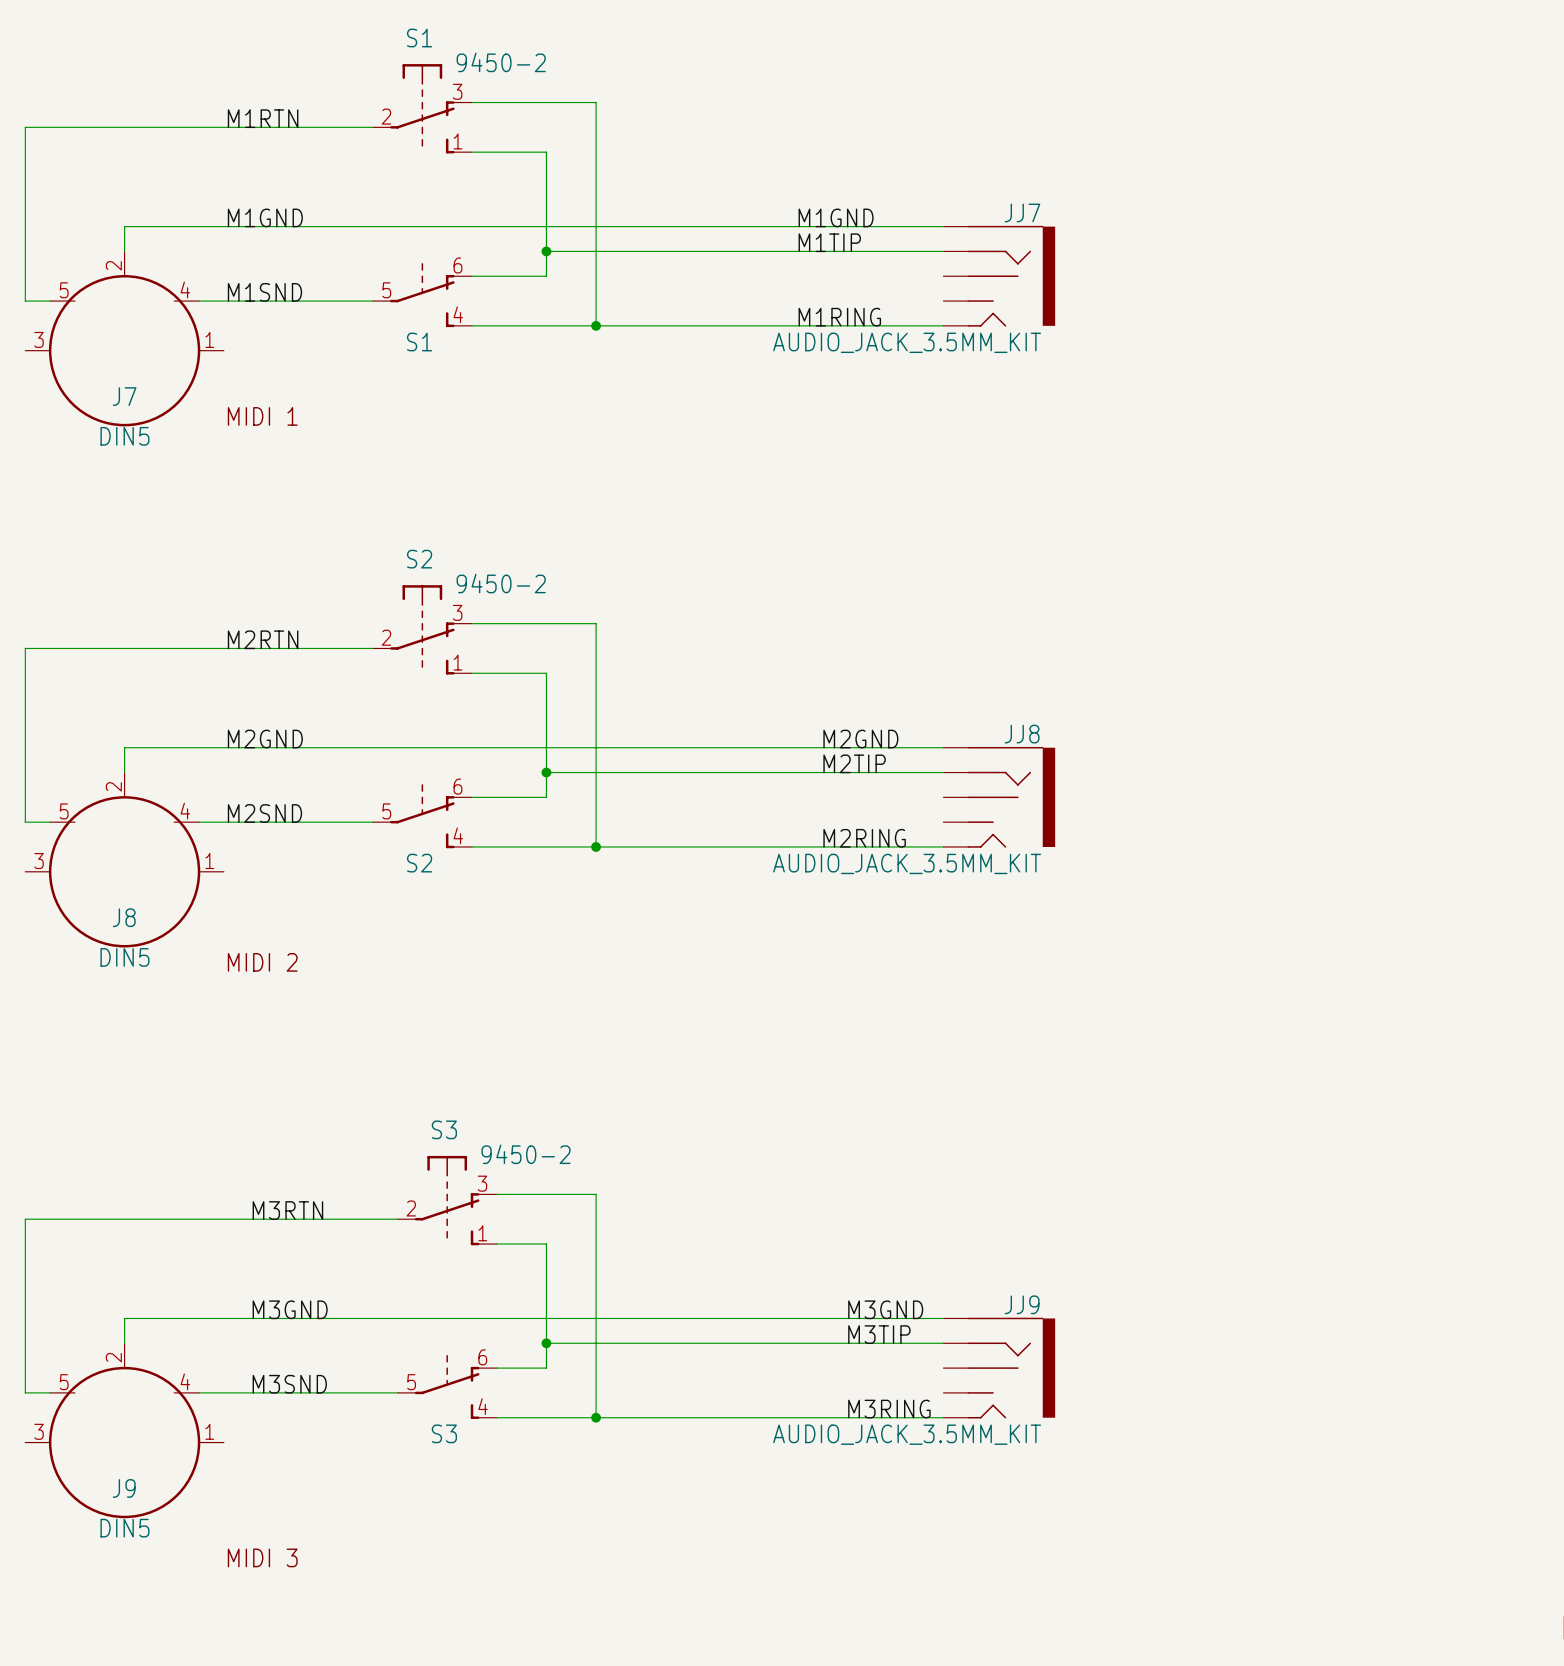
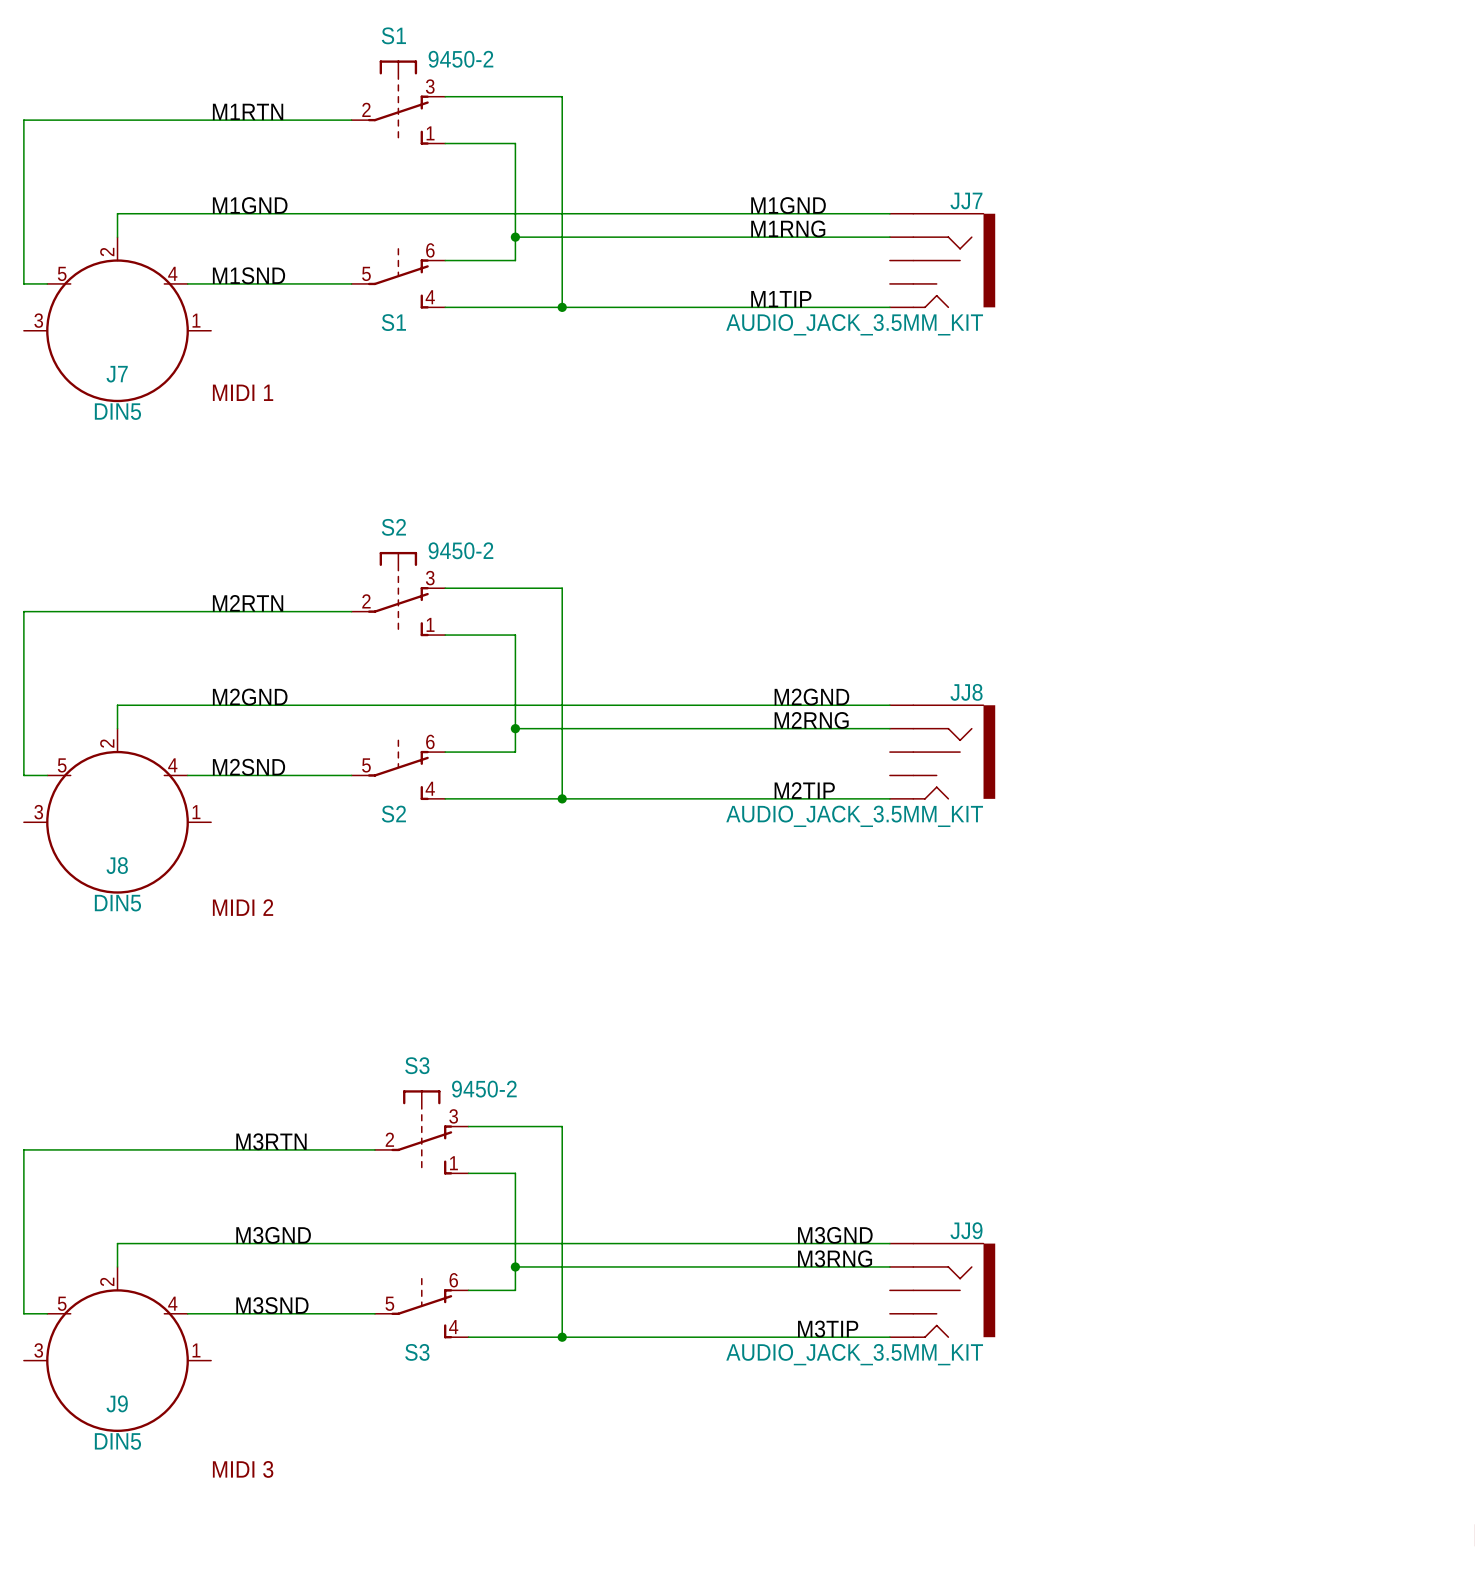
label: M1TIP (829, 242) -> M1RNG (788, 228)
label: M1RING (839, 317) -> M1TIP (781, 299)
label: M2TIP (854, 763) -> M2RNG (811, 720)
label: M2RING (864, 838) -> M2TIP (804, 790)
label: M3TIP (879, 1334) -> M3RNG (835, 1258)
label: M3RING (889, 1409) -> M3TIP (828, 1329)

